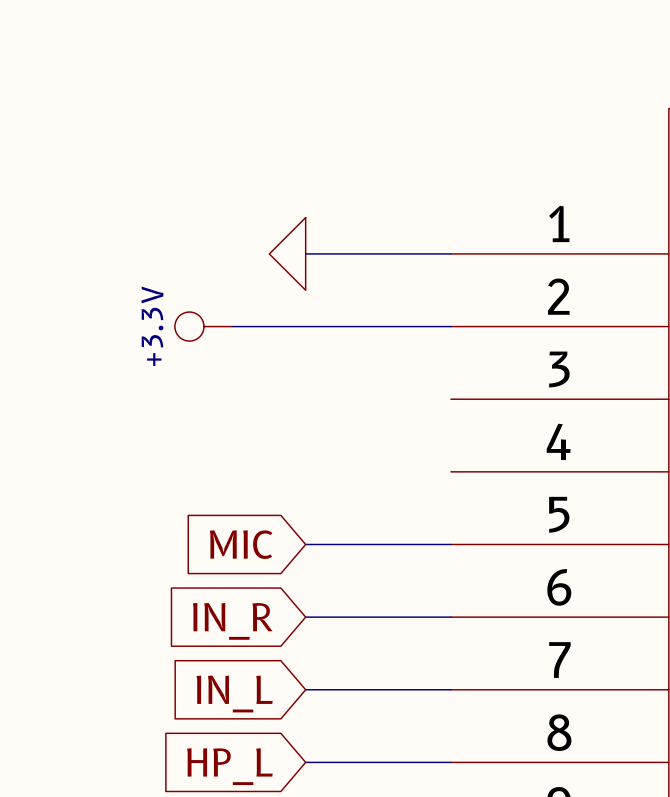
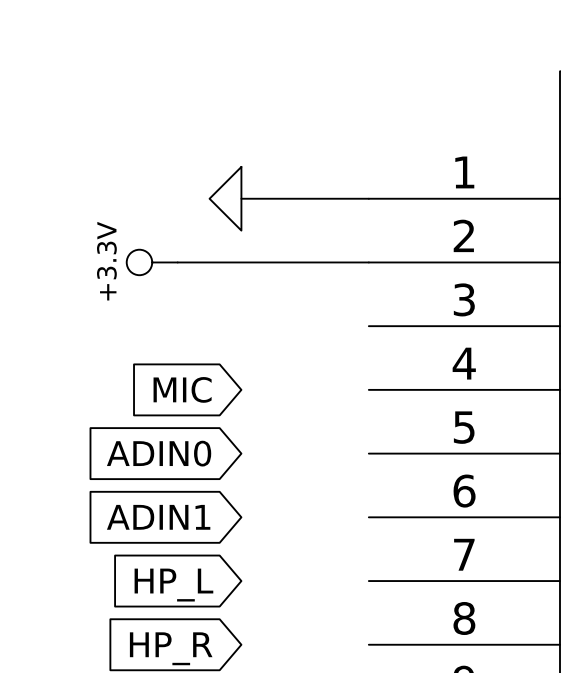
global label: none -> MIC (182, 389)
global label: MIC (241, 544) -> ADIN0 (159, 453)
wire: (305, 544) (450, 544) -> none
wire: (305, 617) (450, 617) -> none
global label: IN_R (232, 621) -> ADIN1 (158, 517)
wire: (305, 689) (450, 689) -> none
global label: IN_L (234, 694) -> HP_L (173, 585)
wire: (305, 762) (450, 762) -> none
global label: HP_L (229, 766) -> HP_R (171, 648)

